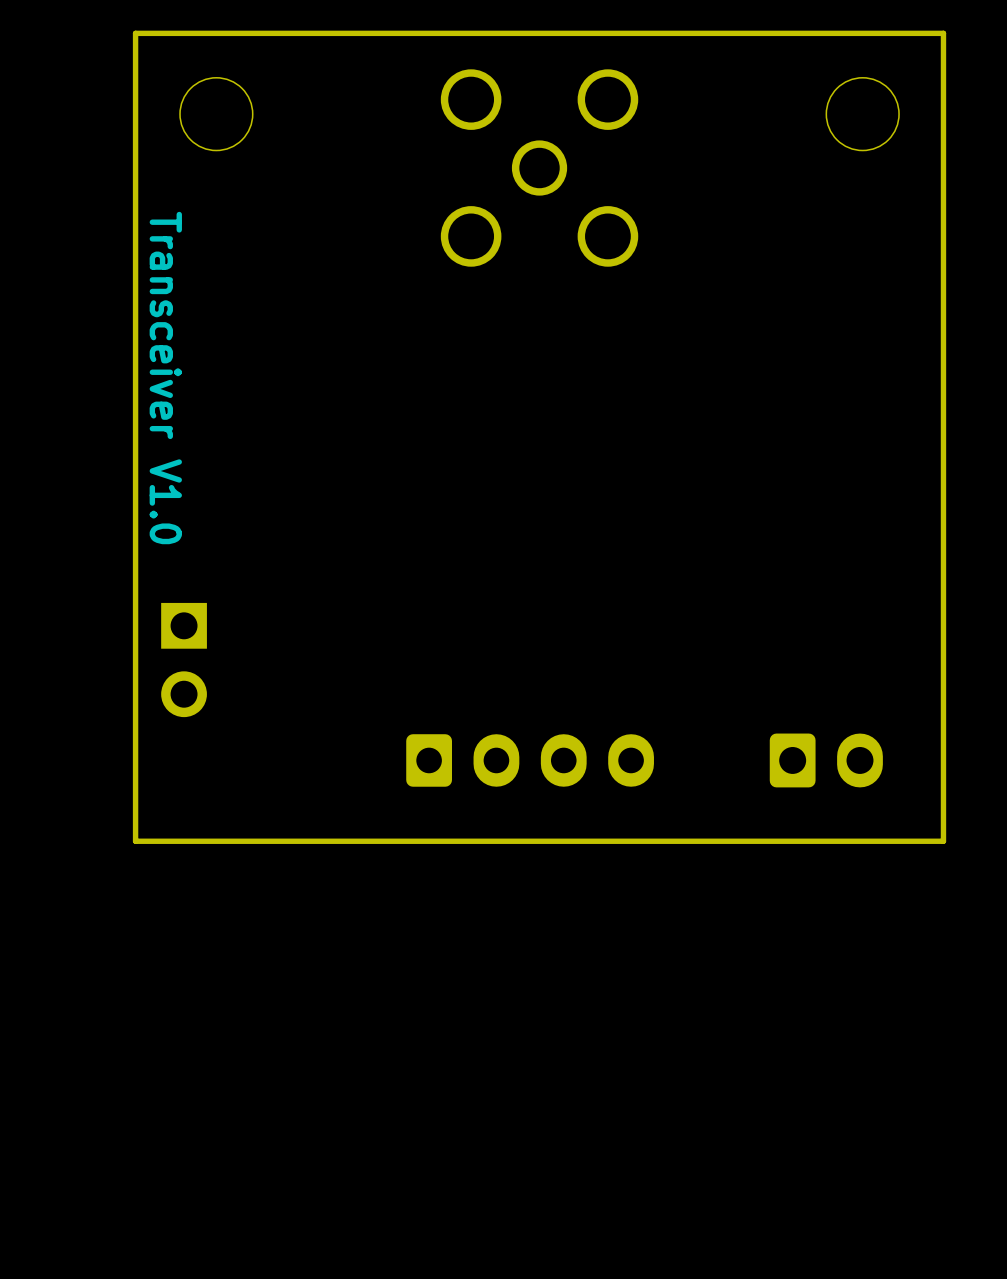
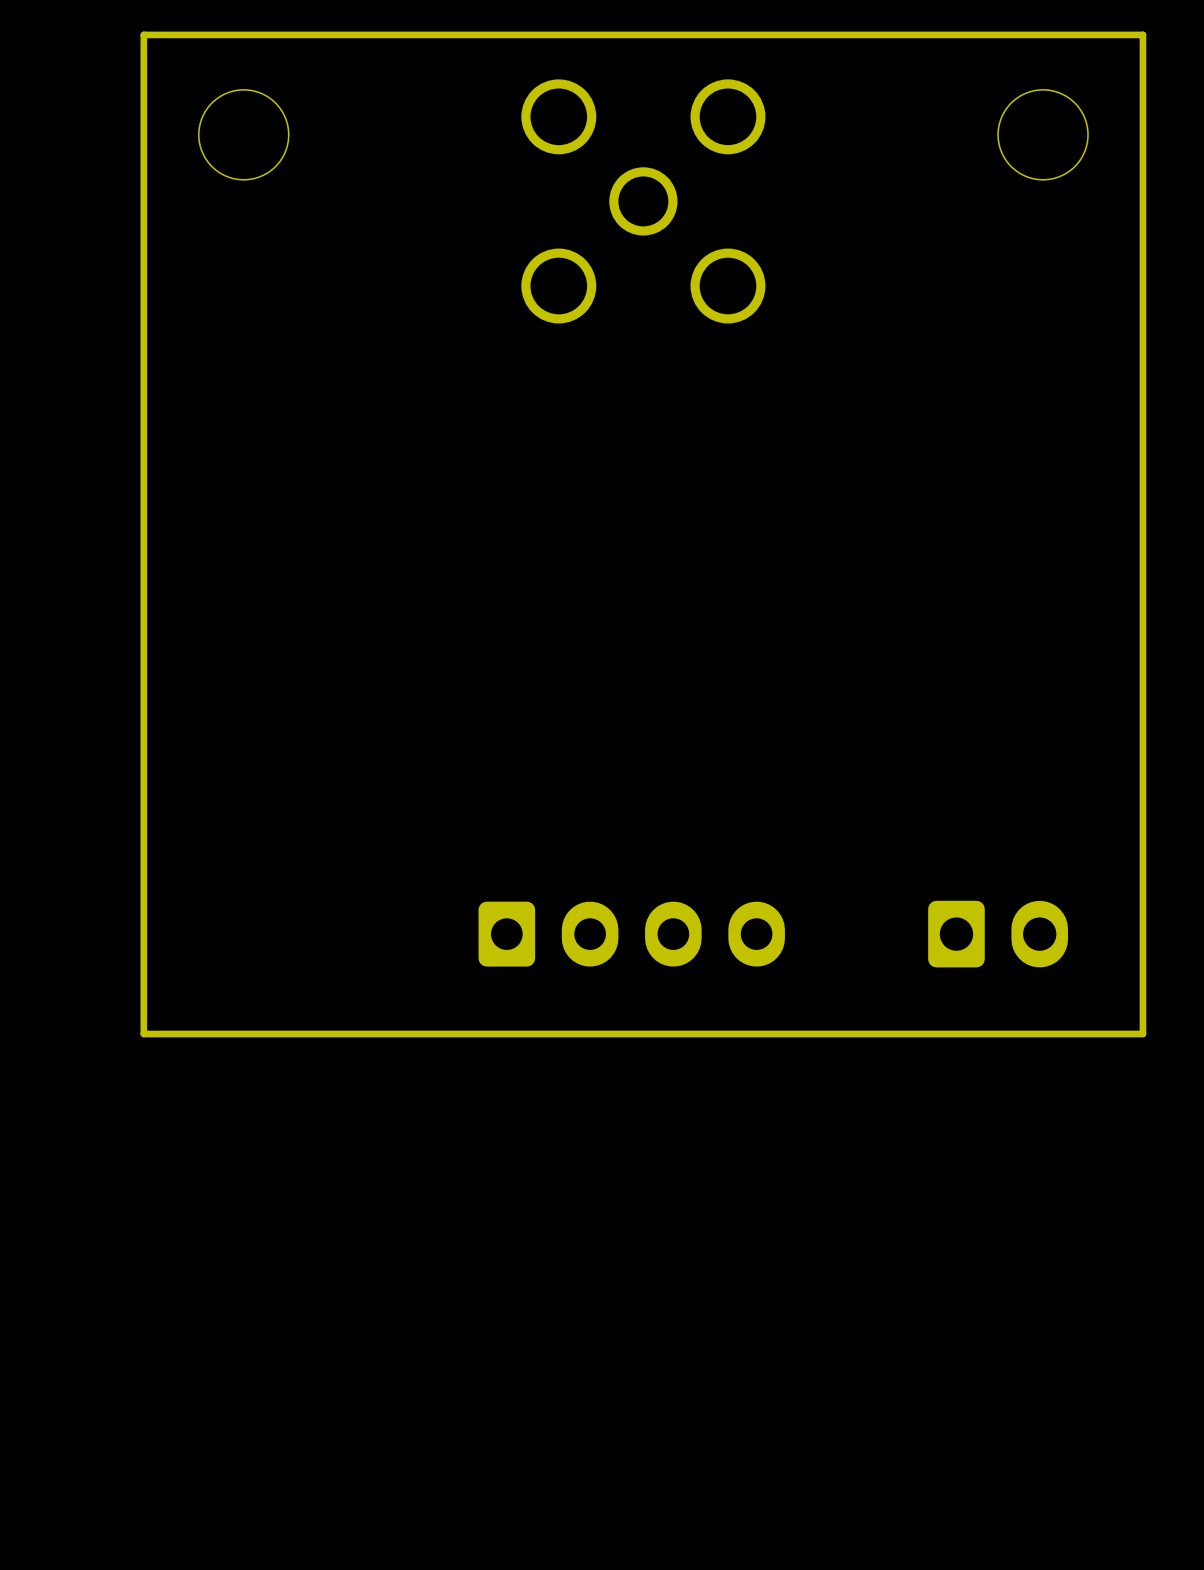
text: Transceiver V1.0 (165, 378) -> none
part: (184, 660) -> none

